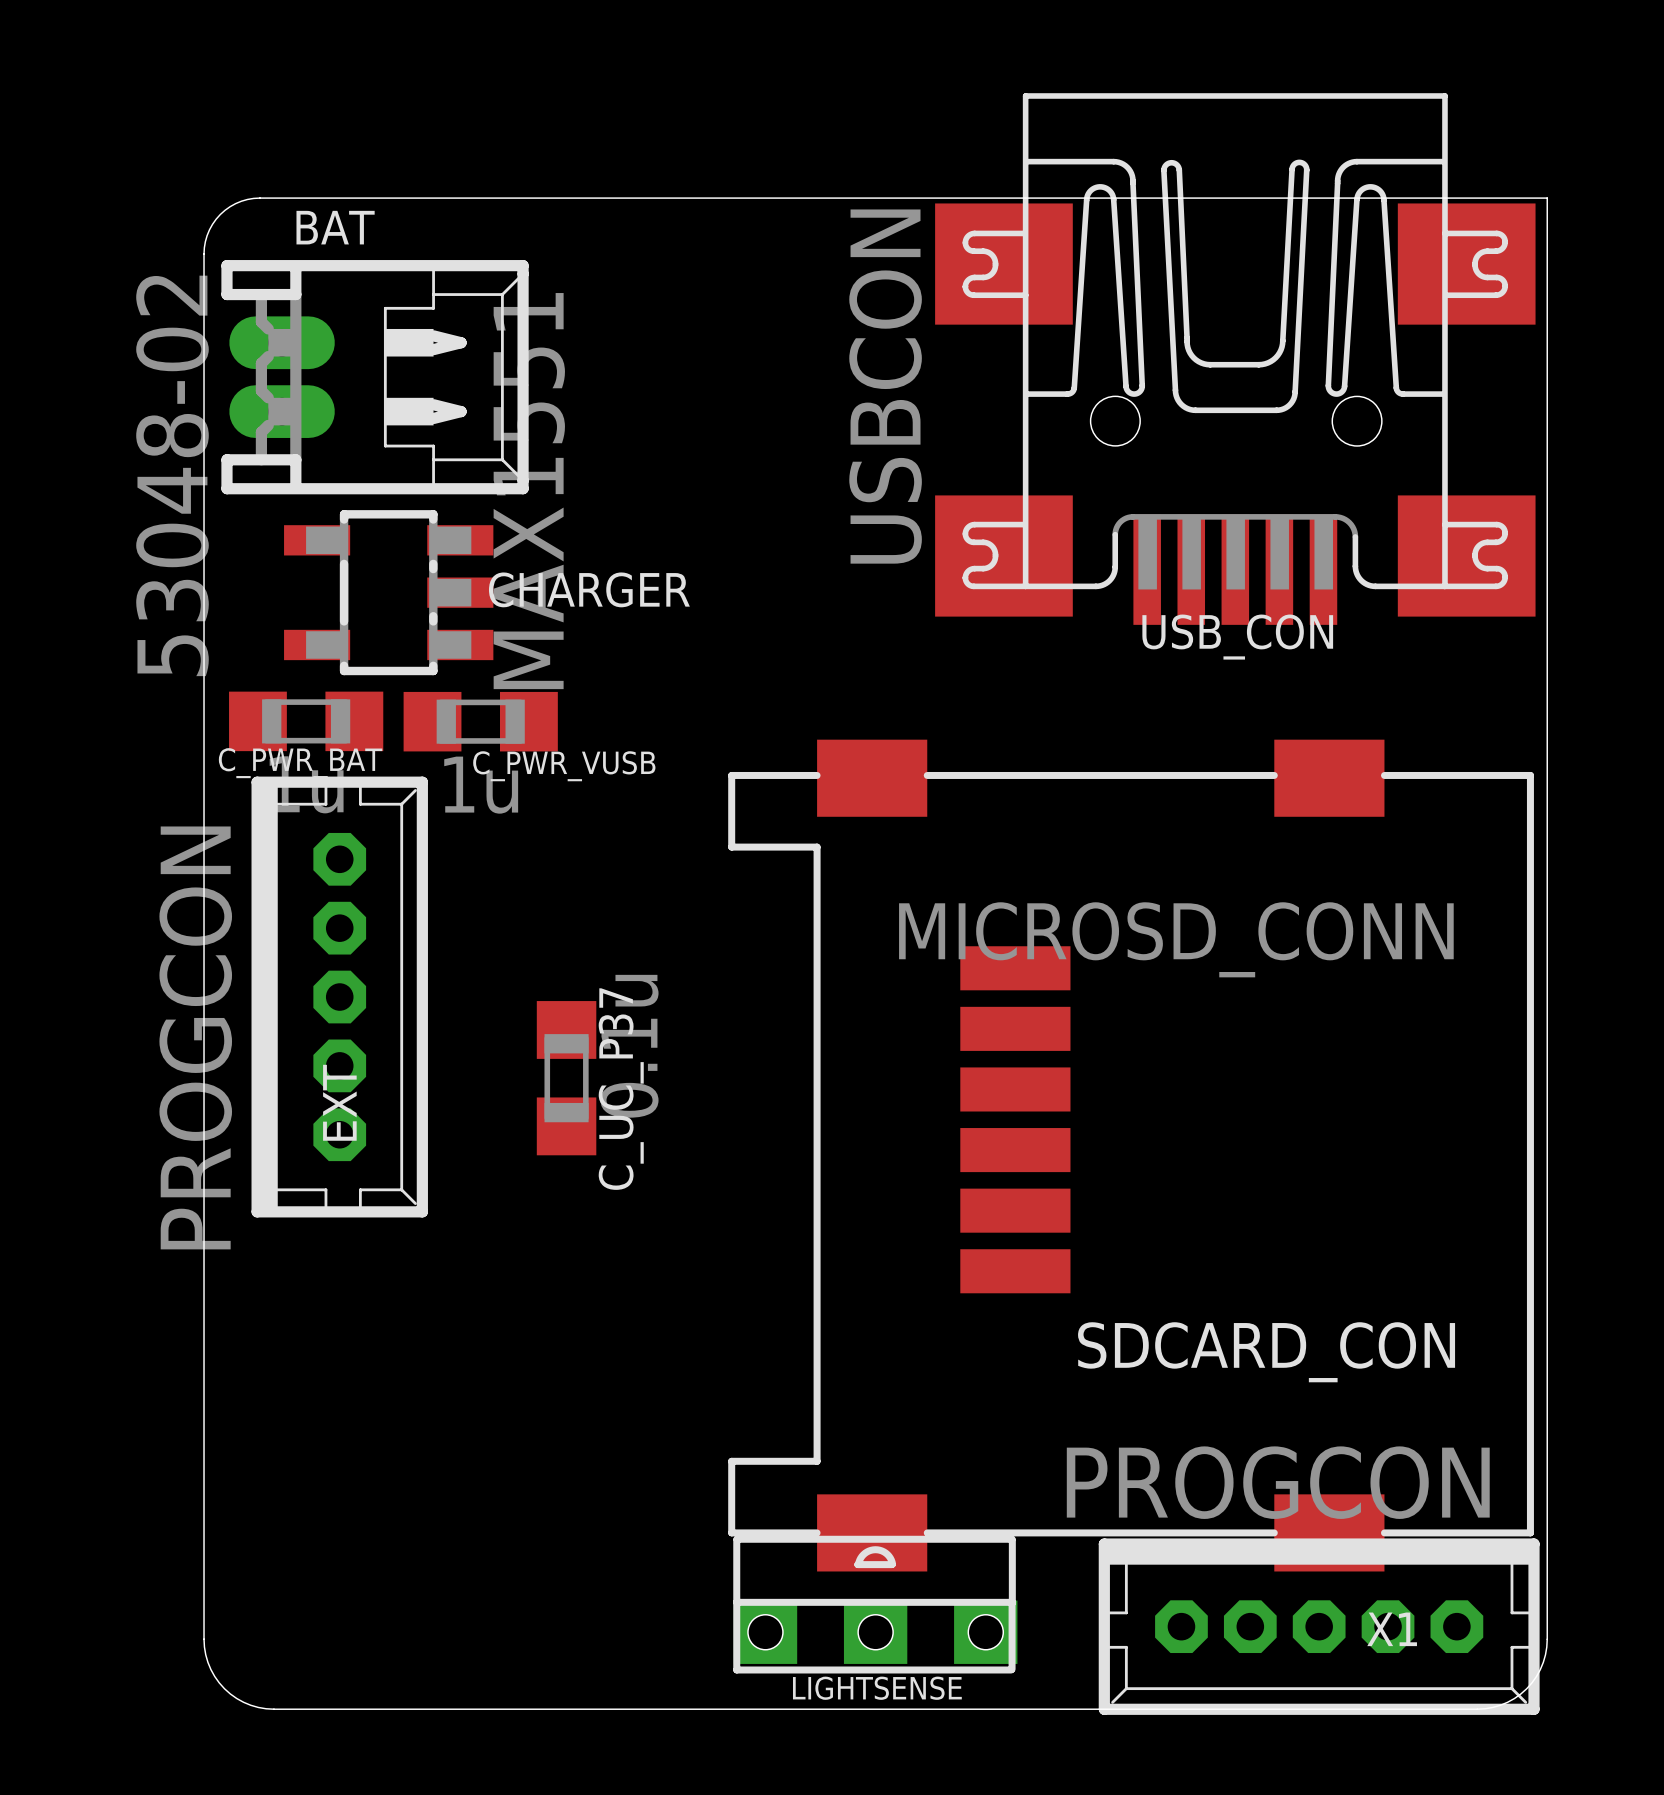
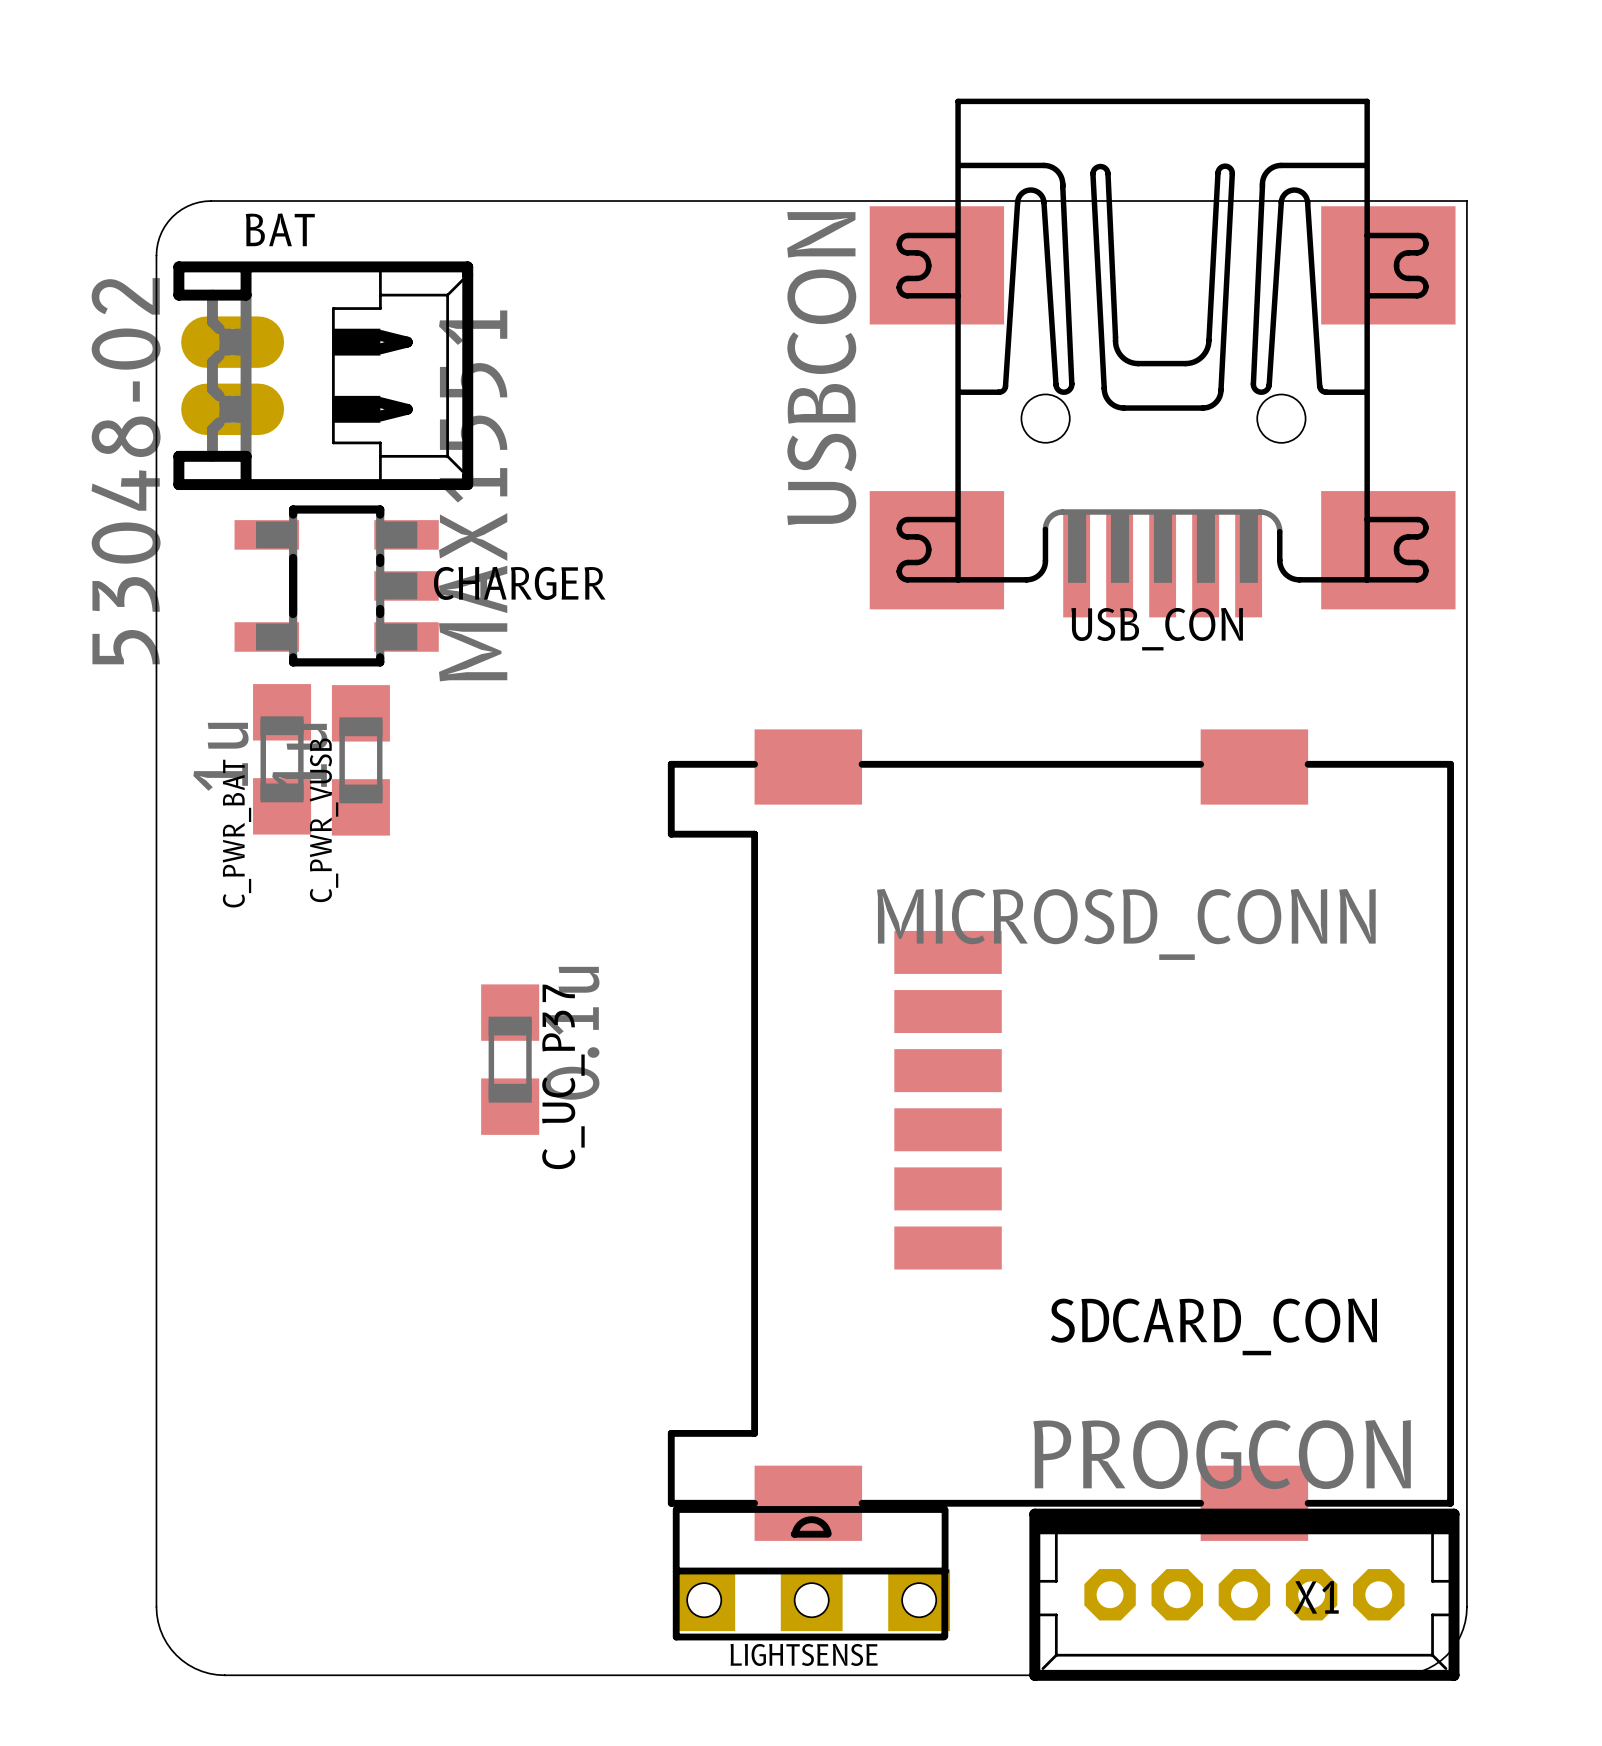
C_PWR_BAT rotation: 0° (306, 721) -> 90° clockwise (282, 759)
C_PWR_VUSB rotation: 0° (480, 721) -> 90° clockwise (360, 760)
EXT: PROGCON (339, 997) -> none

